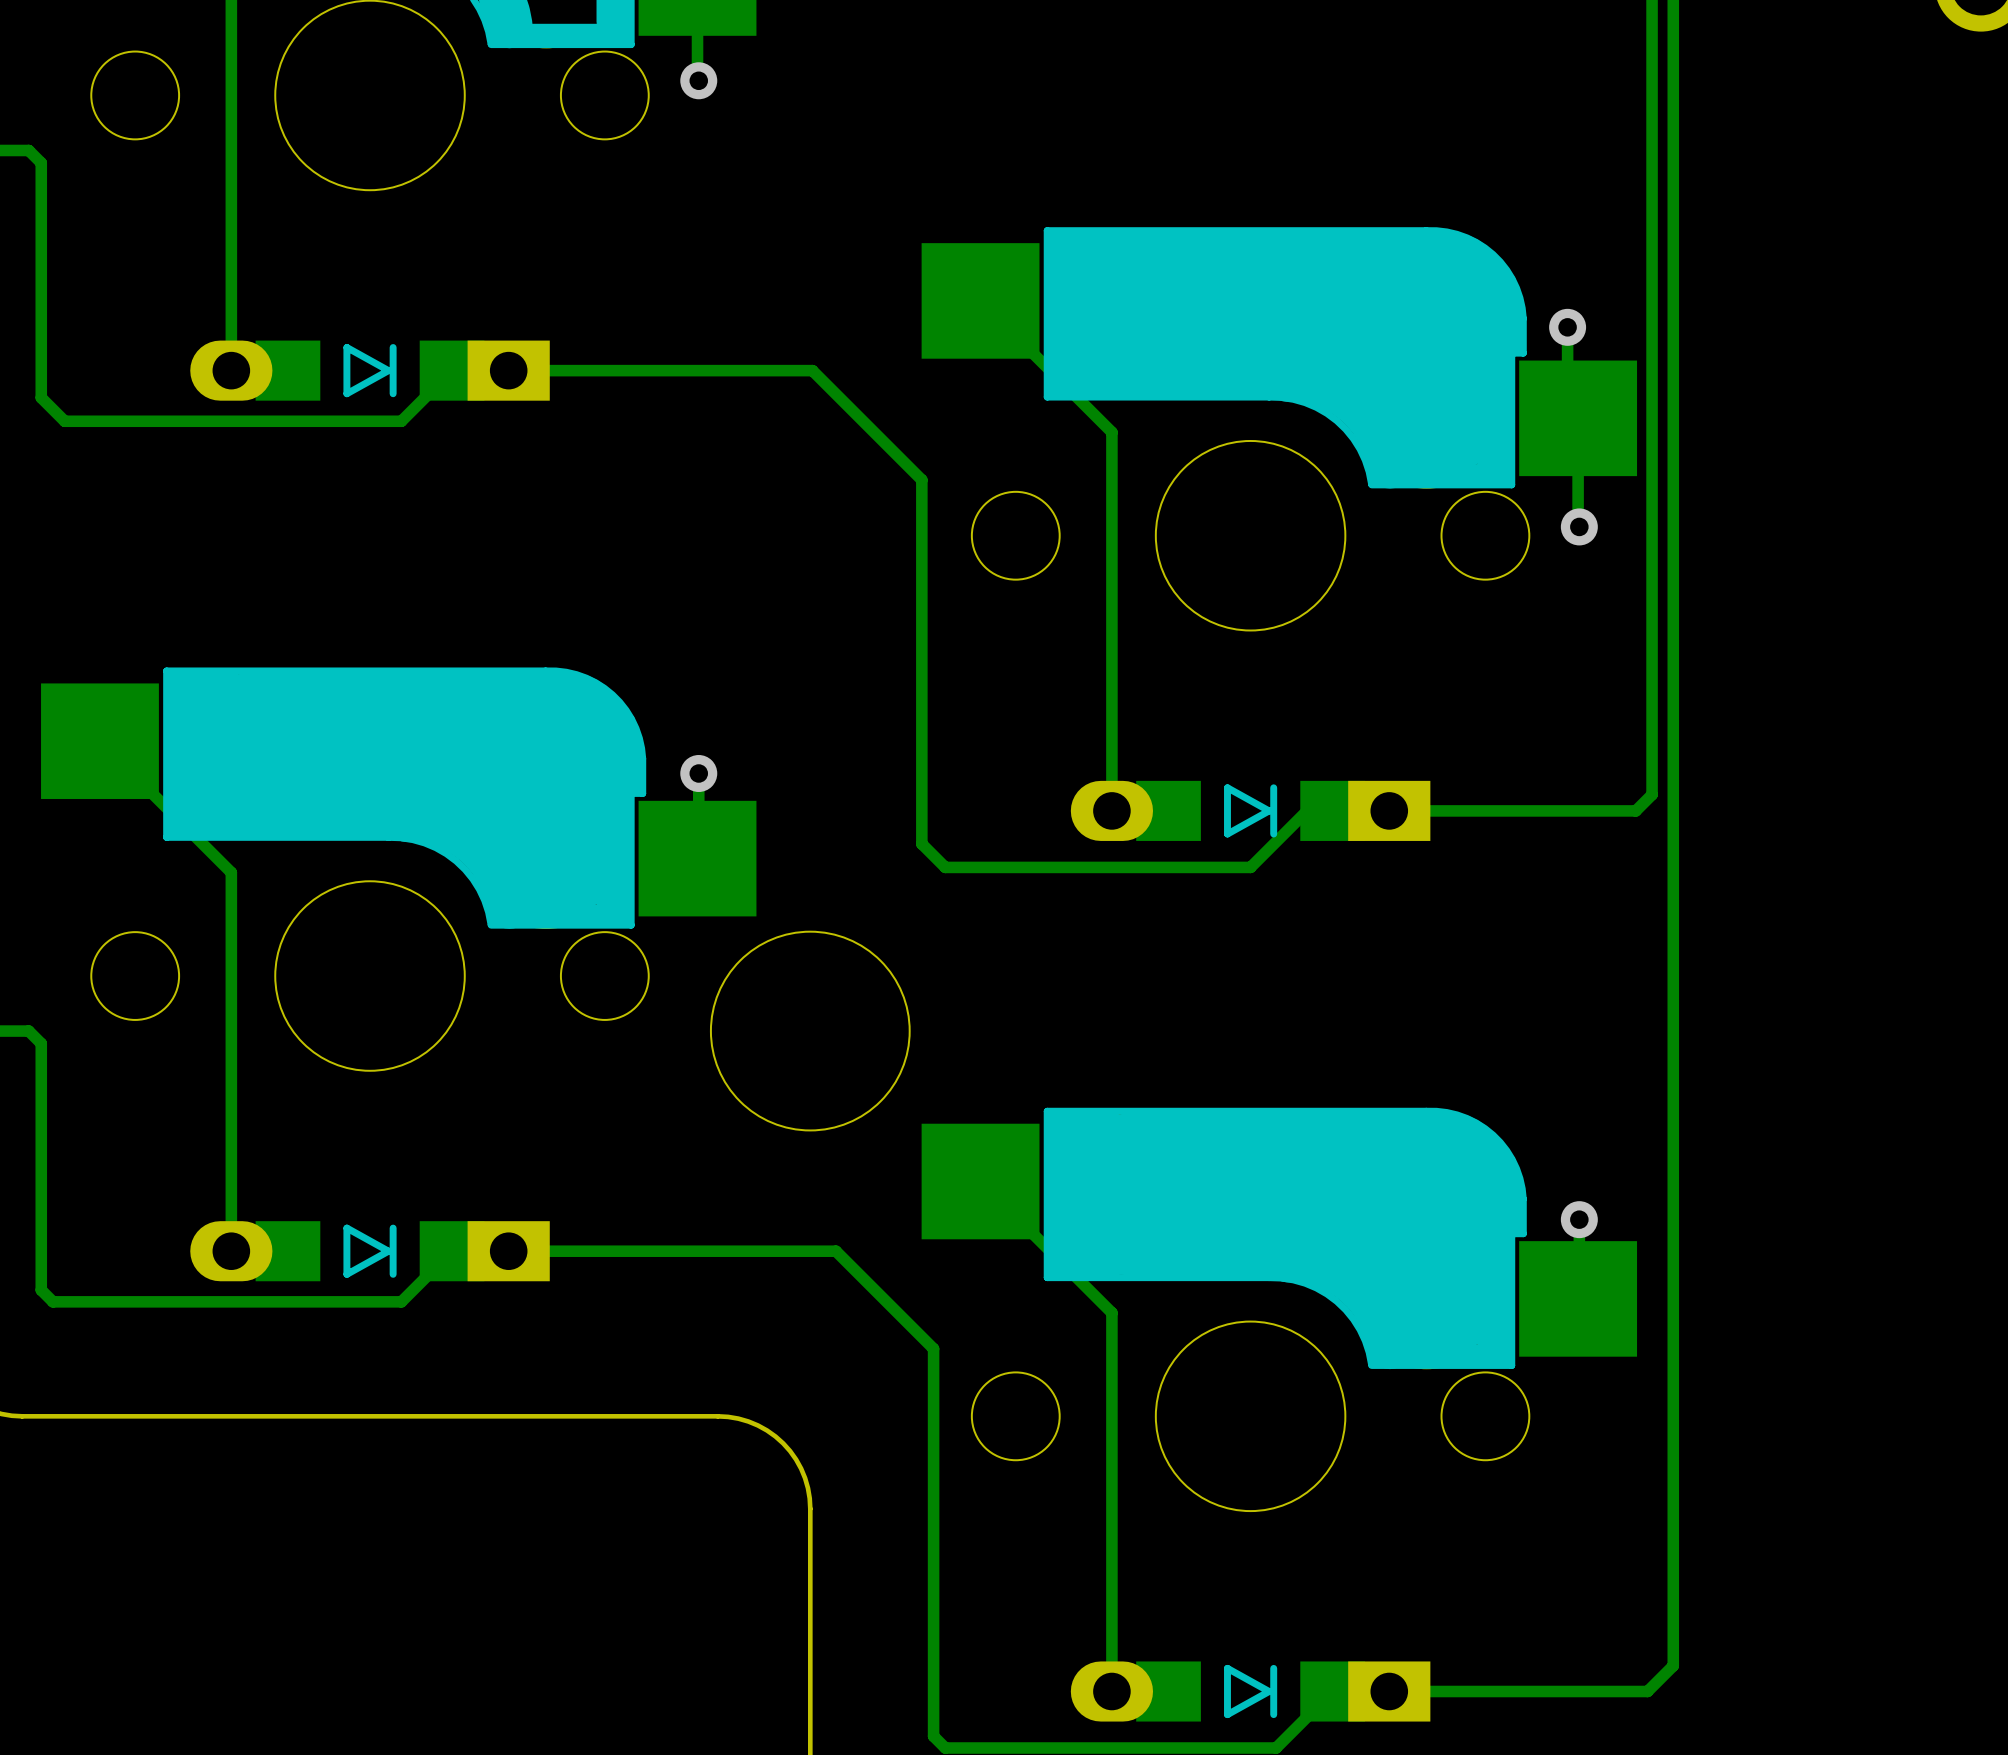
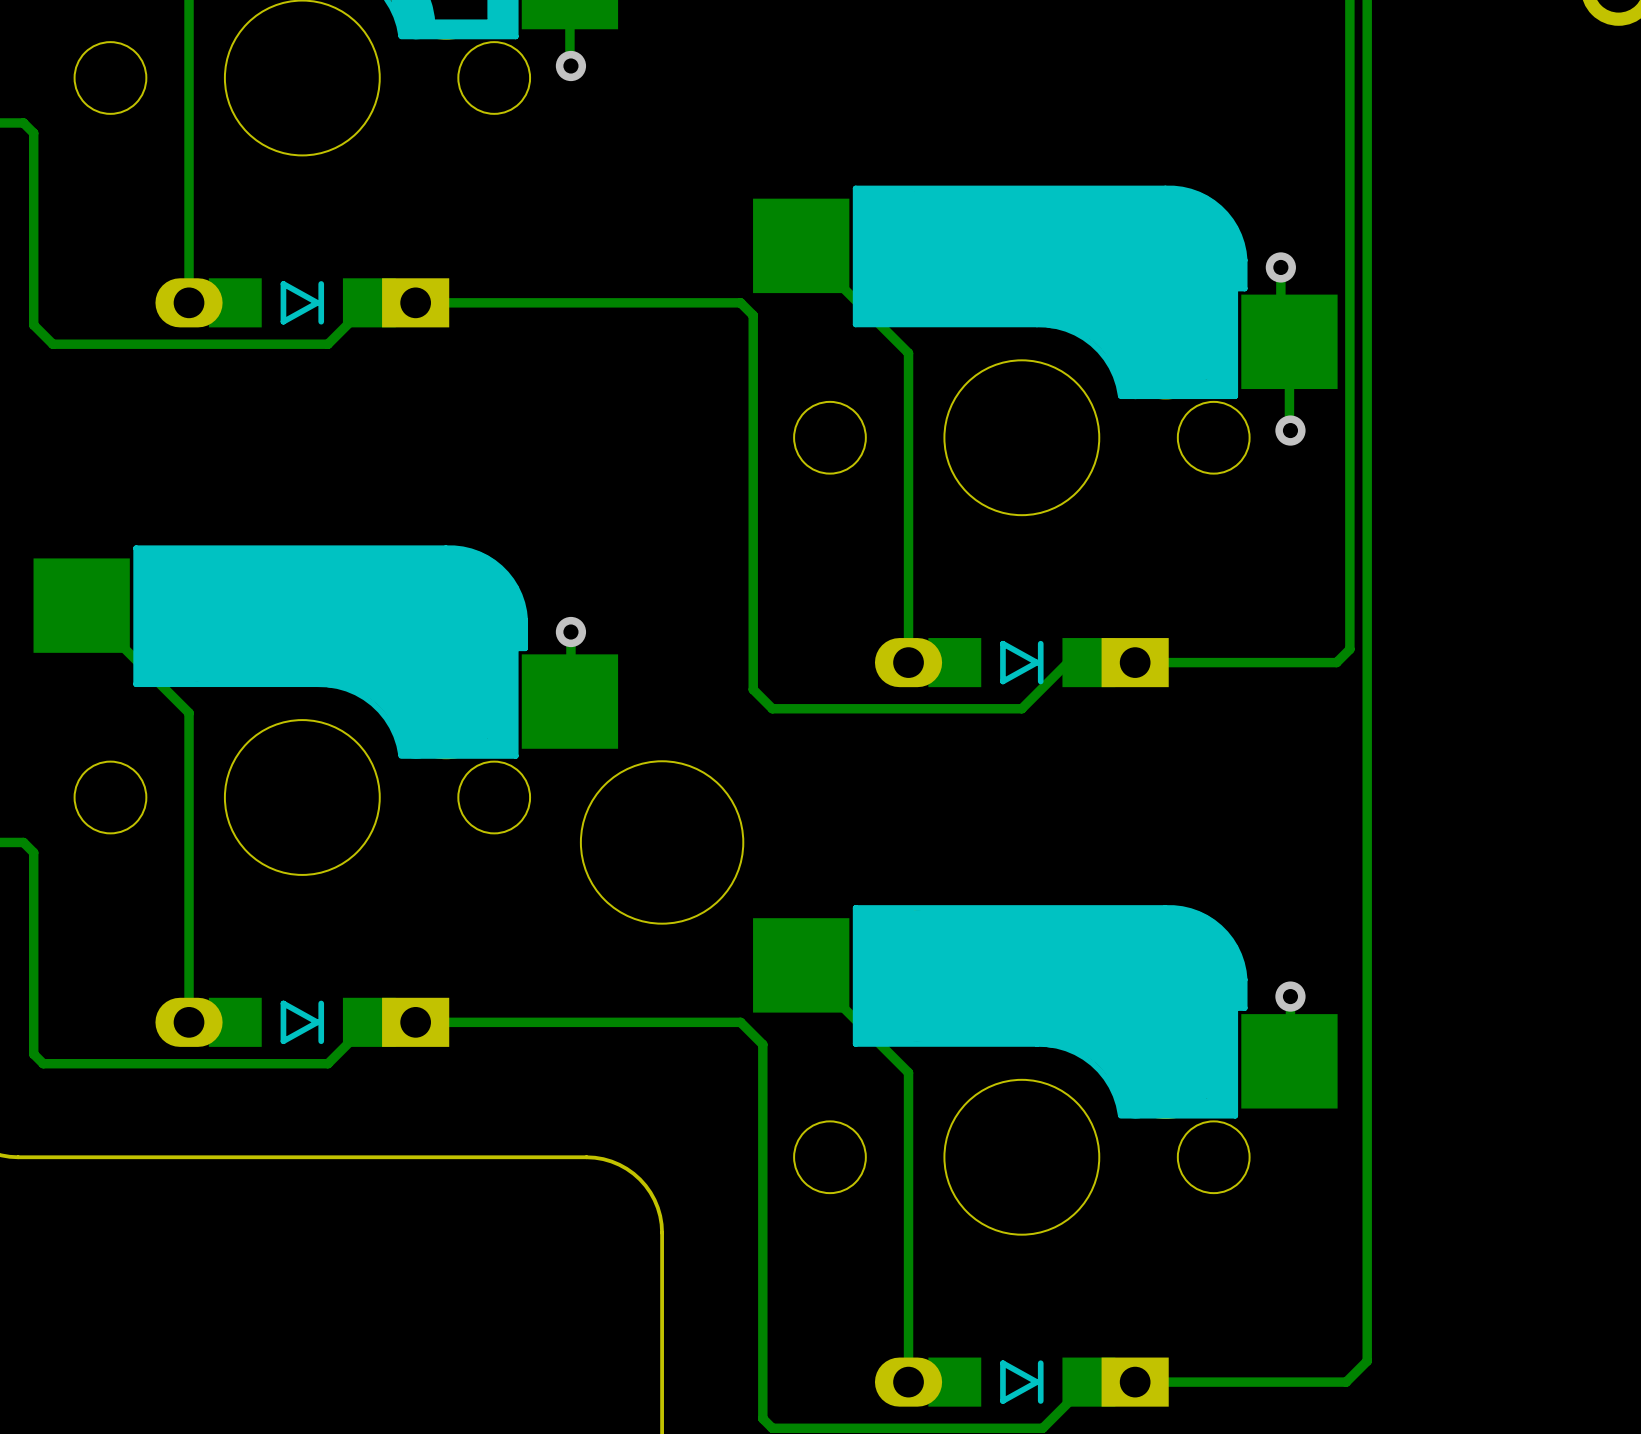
track: (812, 370) (921, 479) -> (663, 302) (740, 302) (753, 315) (753, 392)
track: (835, 1251) (933, 1348) -> (683, 1022) (740, 1022) (762, 1044) (762, 1102)

